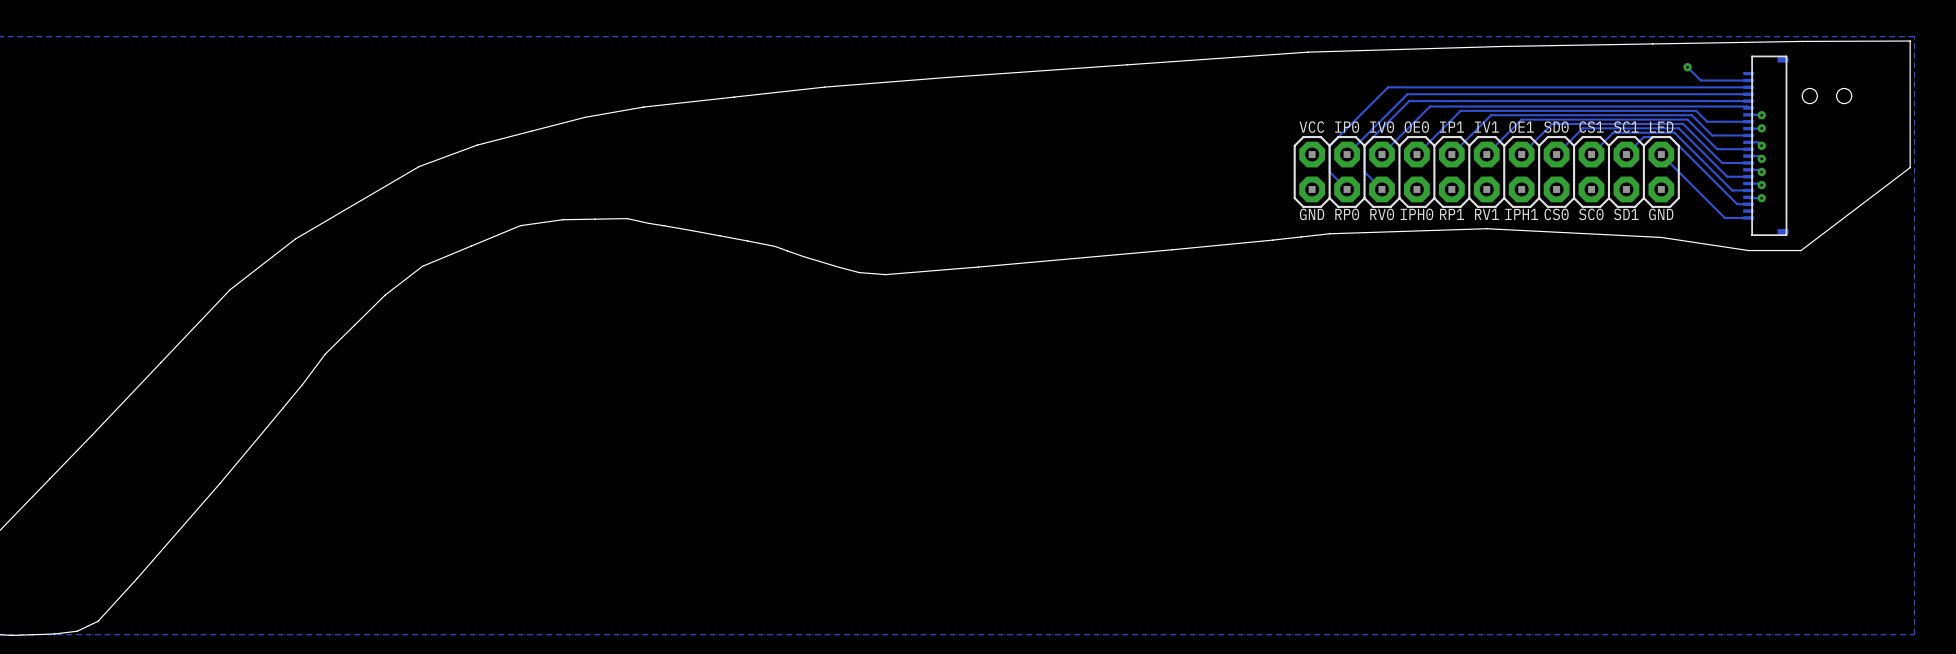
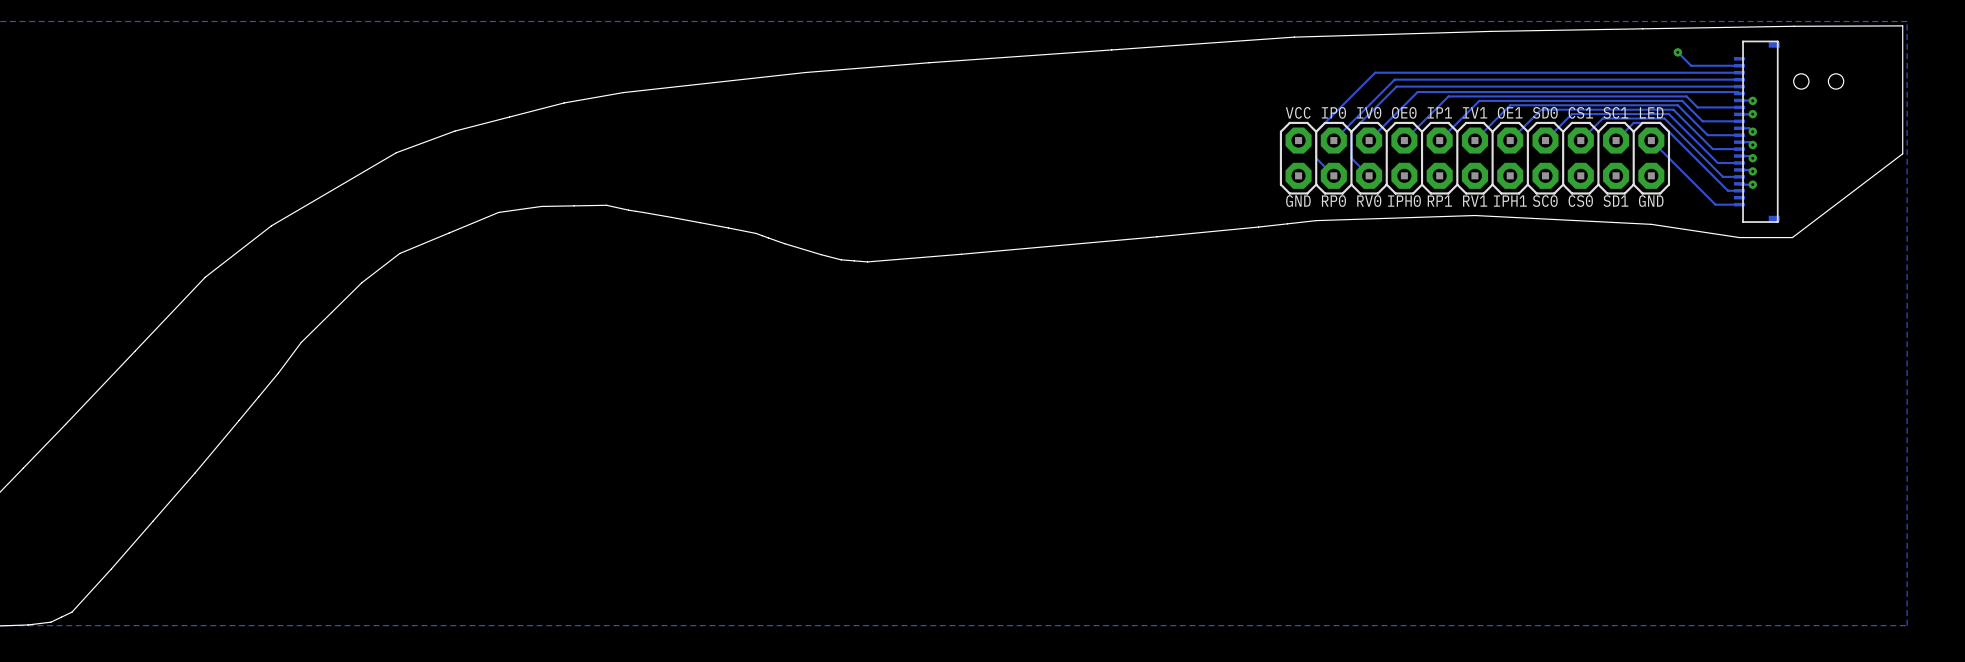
text: CS0 (1556, 214) -> SC0 (1545, 201)
text: SC0 (1591, 214) -> CS0 (1580, 201)

